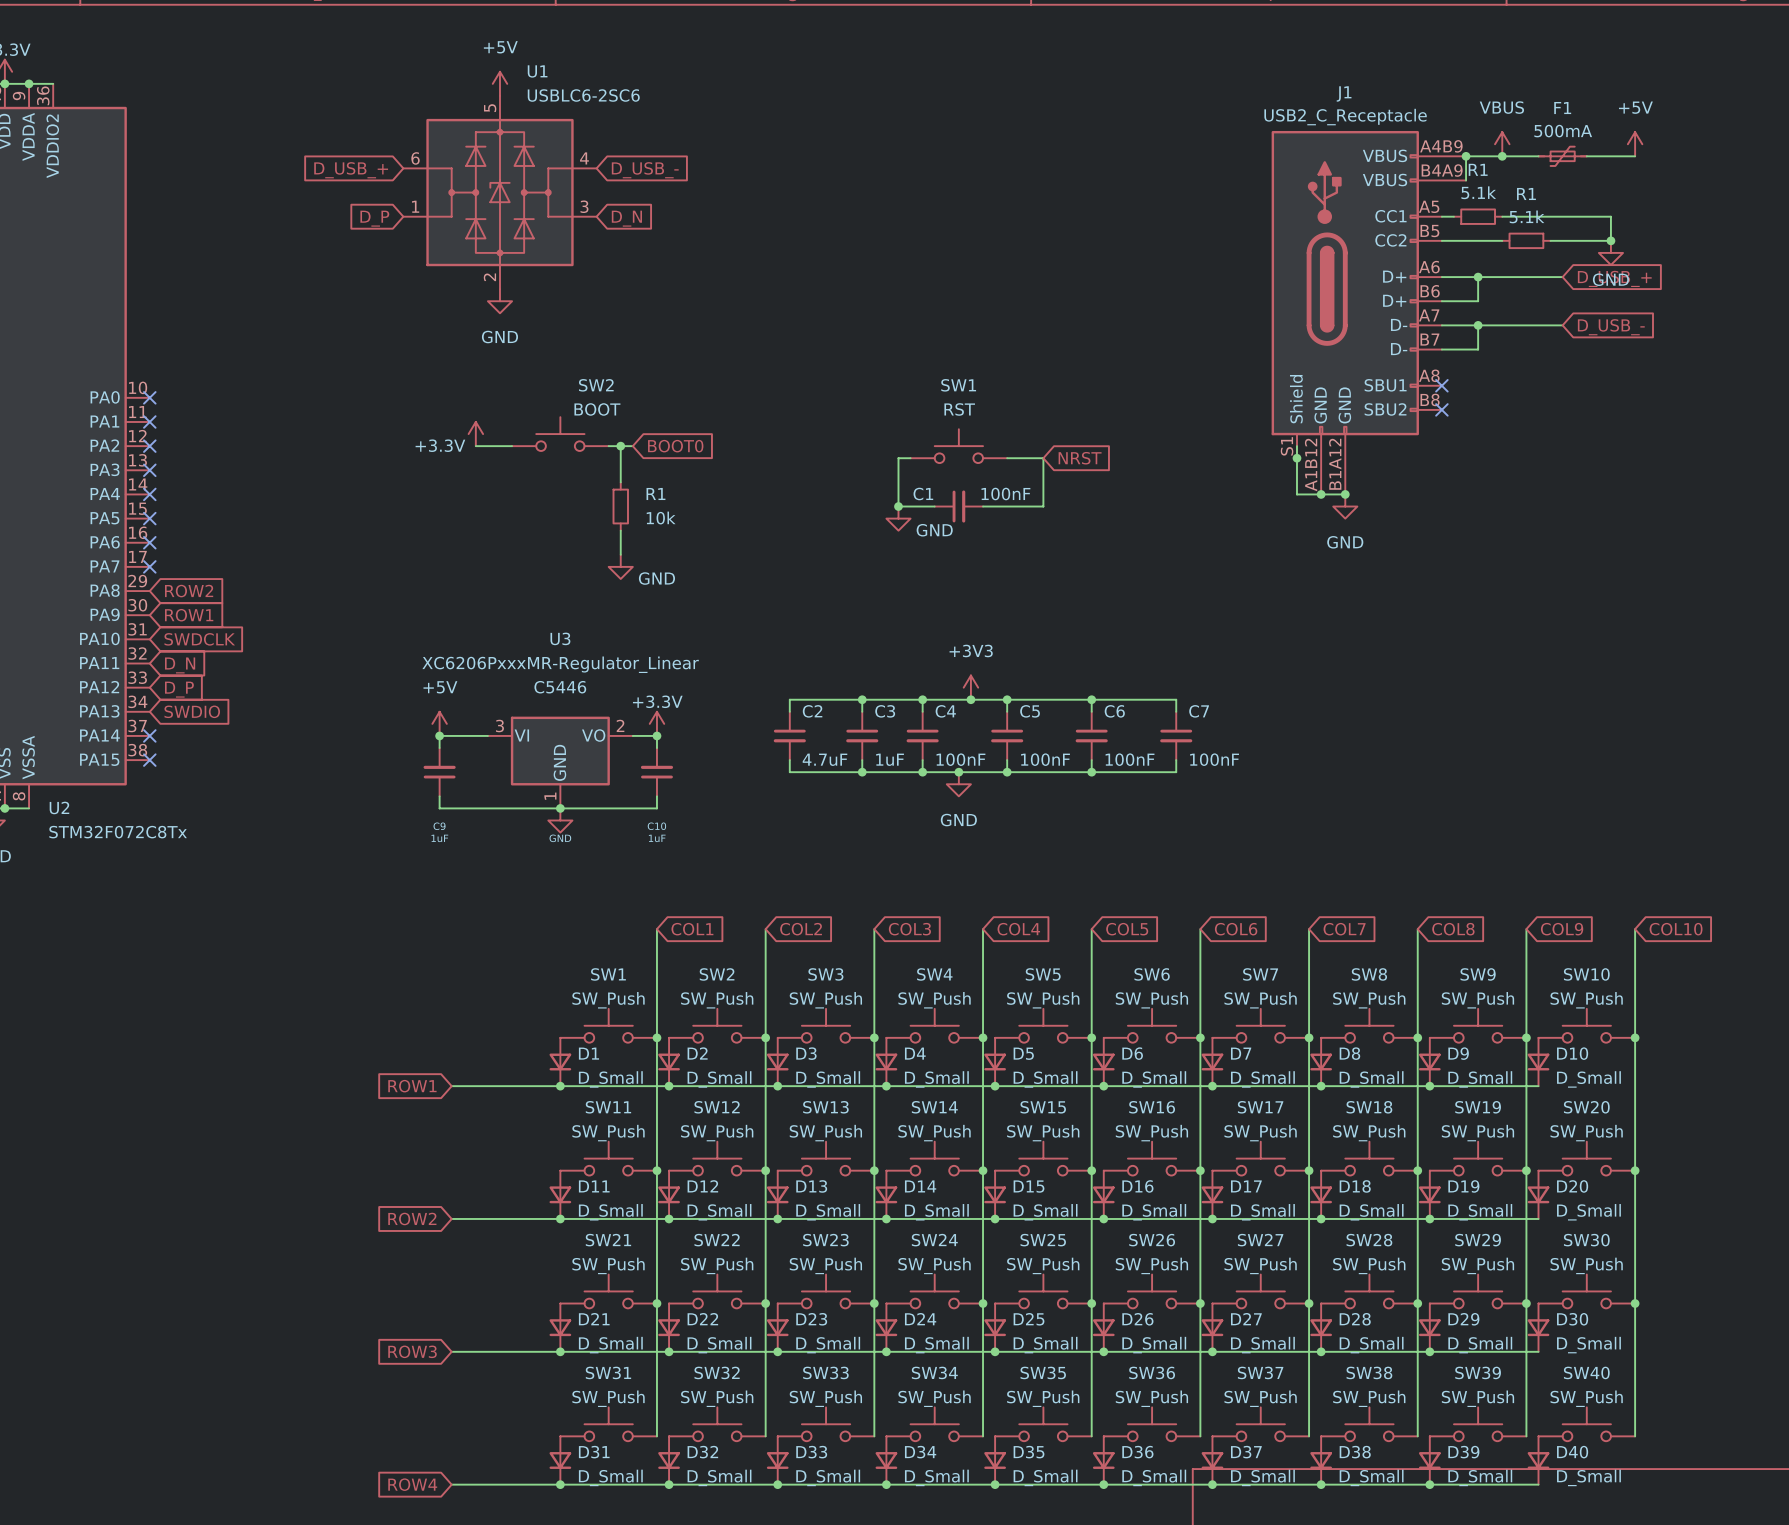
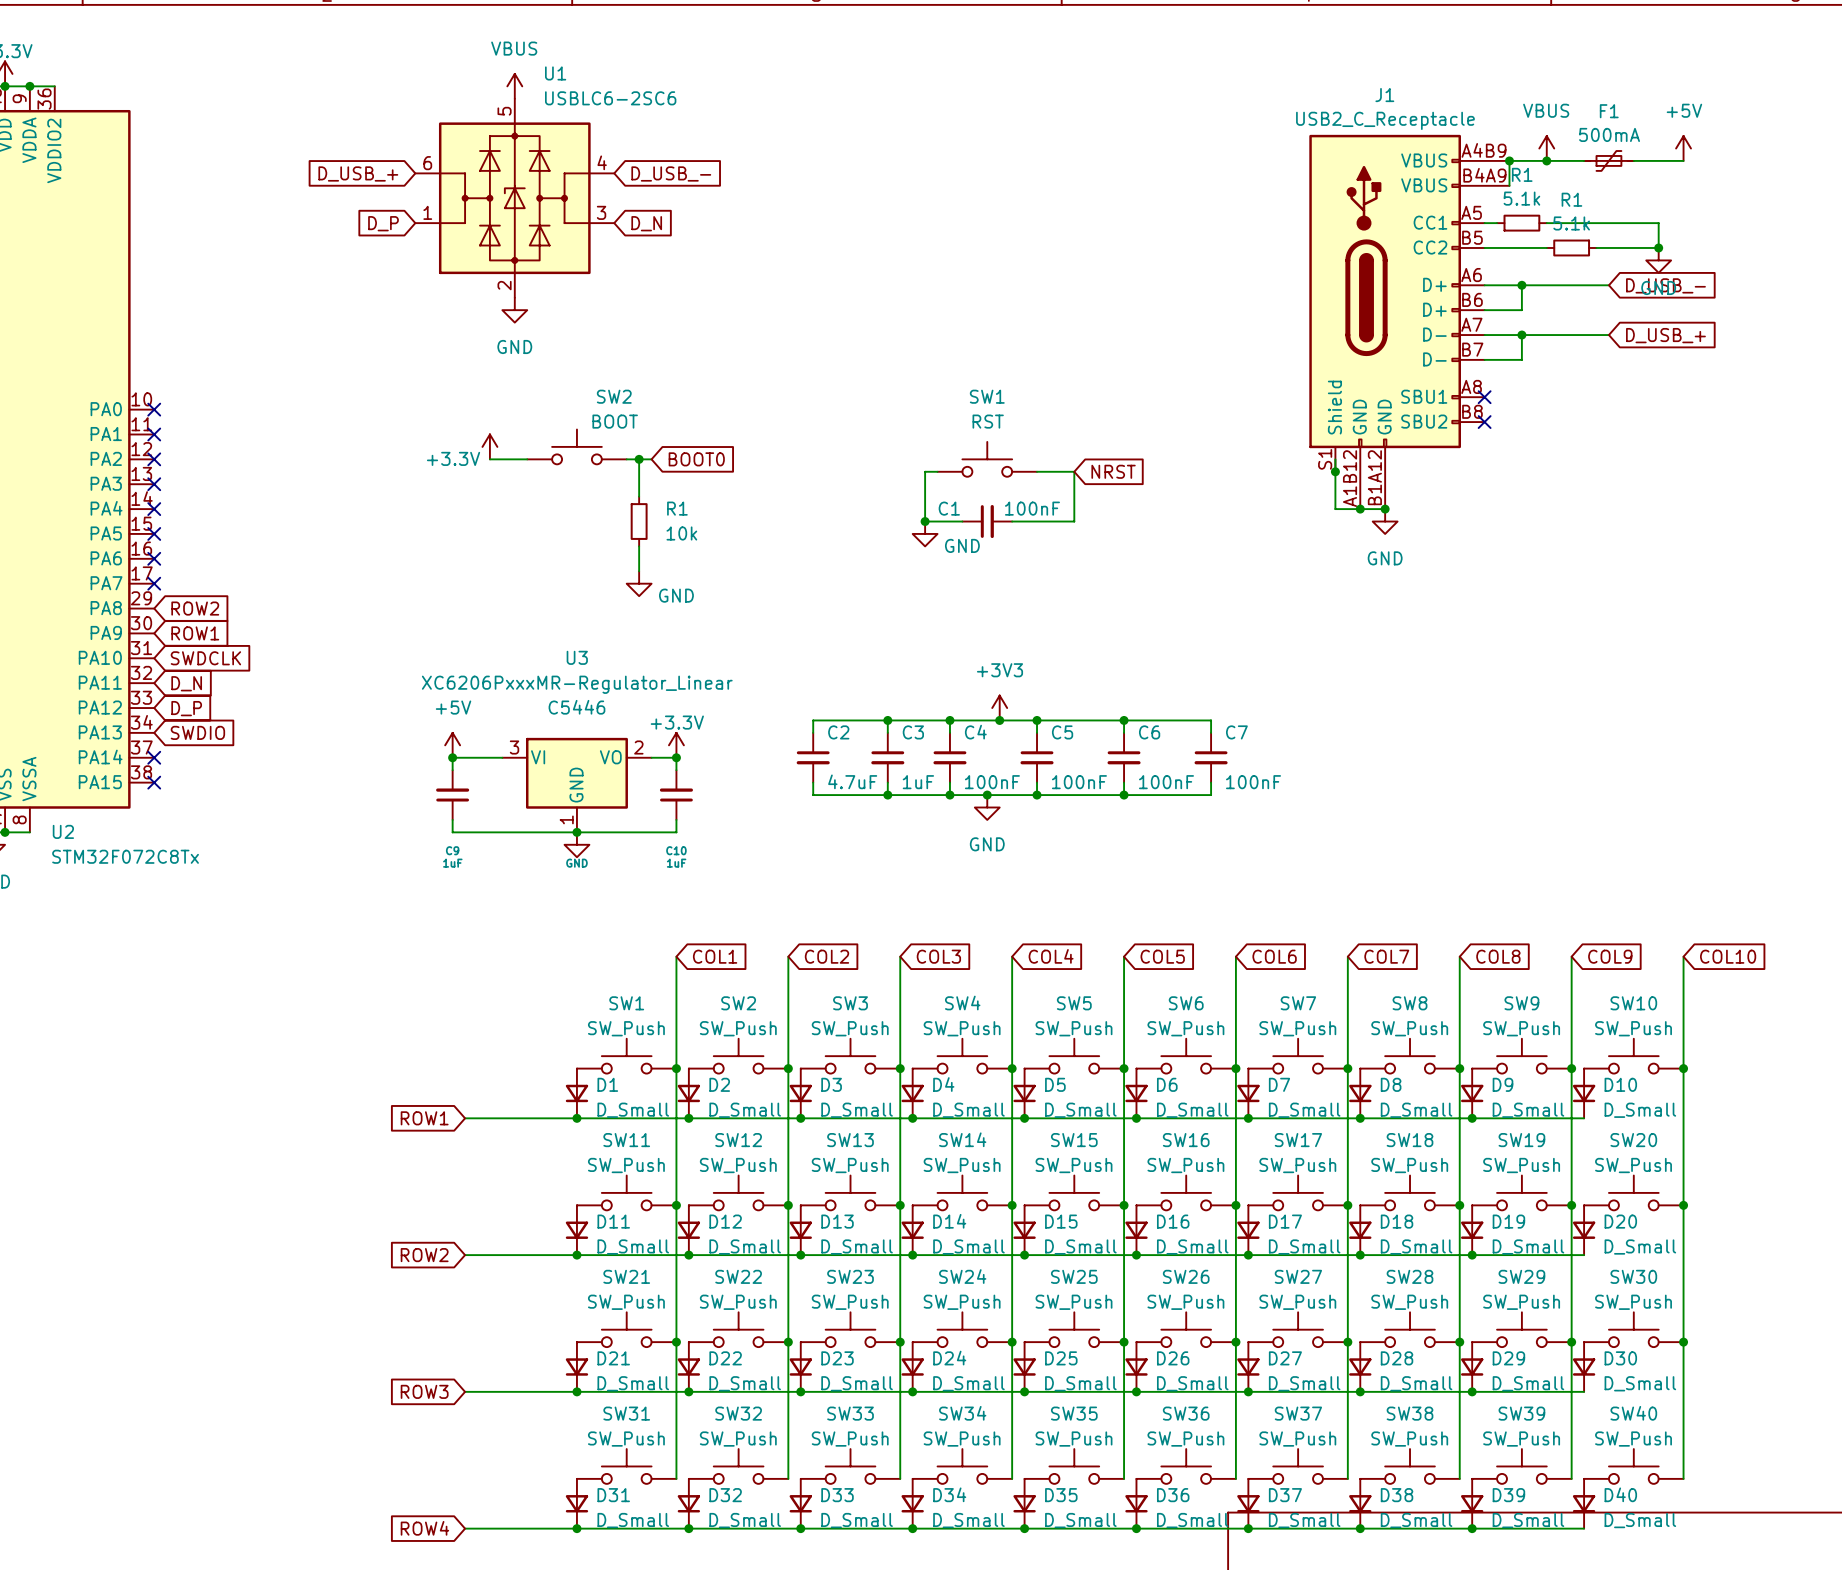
power symbol: +5V (499, 83) -> VBUS (514, 86)
global label: D_USB_+ (1614, 278) -> D_USB_- (1665, 285)
global label: D_USB_- (1611, 327) -> D_USB_+ (1665, 335)

